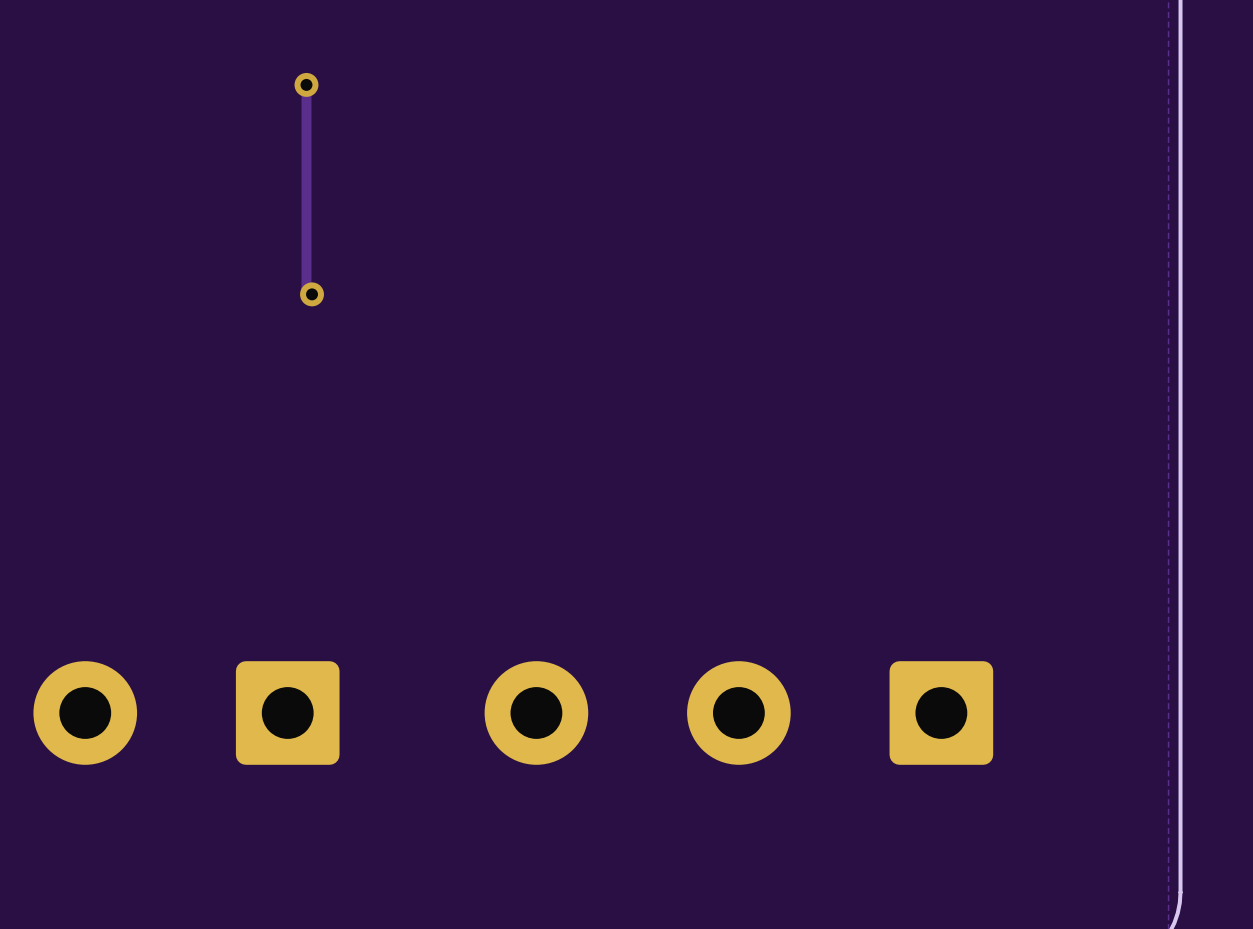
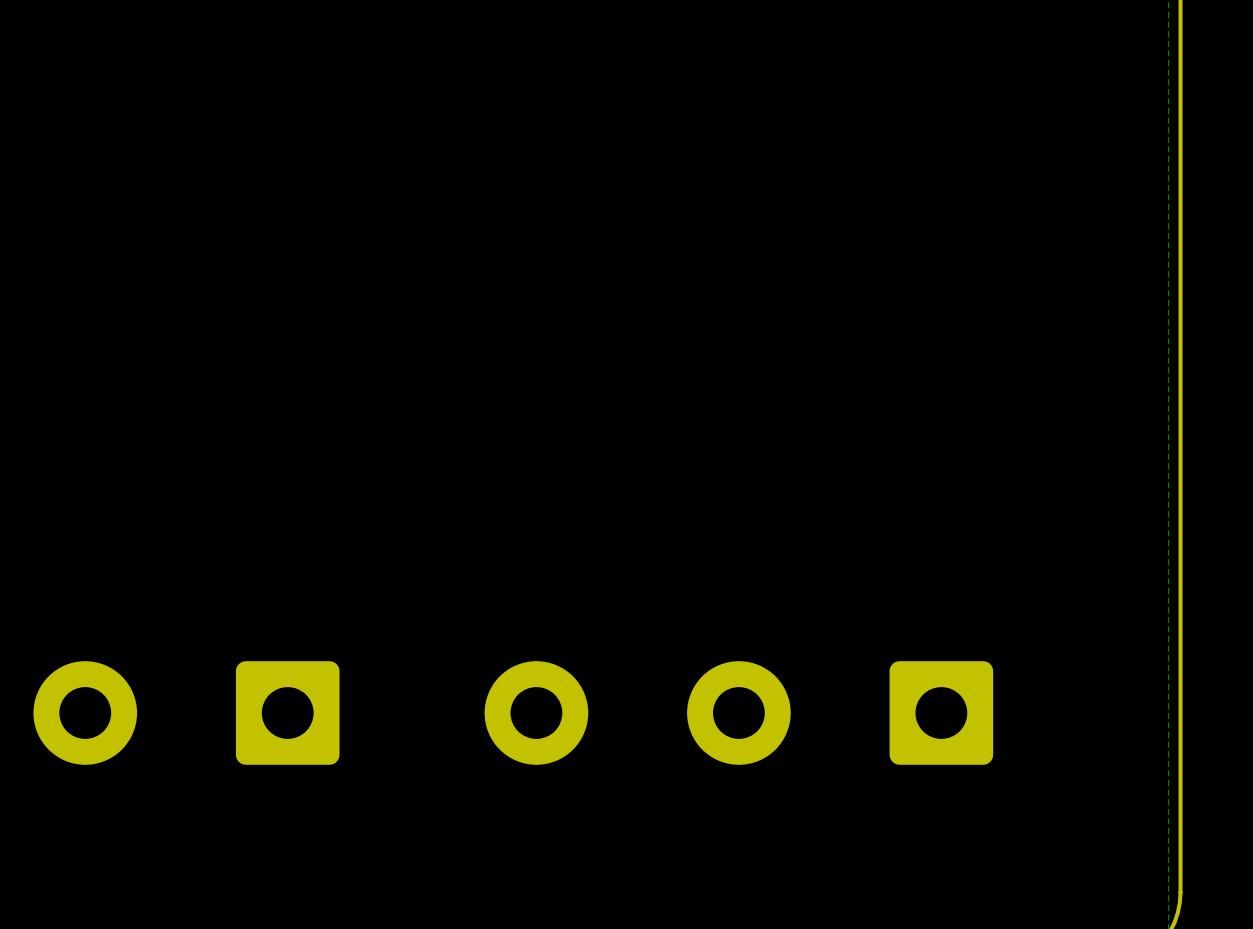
track: (306, 84) (306, 288) (312, 294) -> none
via: (306, 84) -> none
via: (312, 294) -> none

